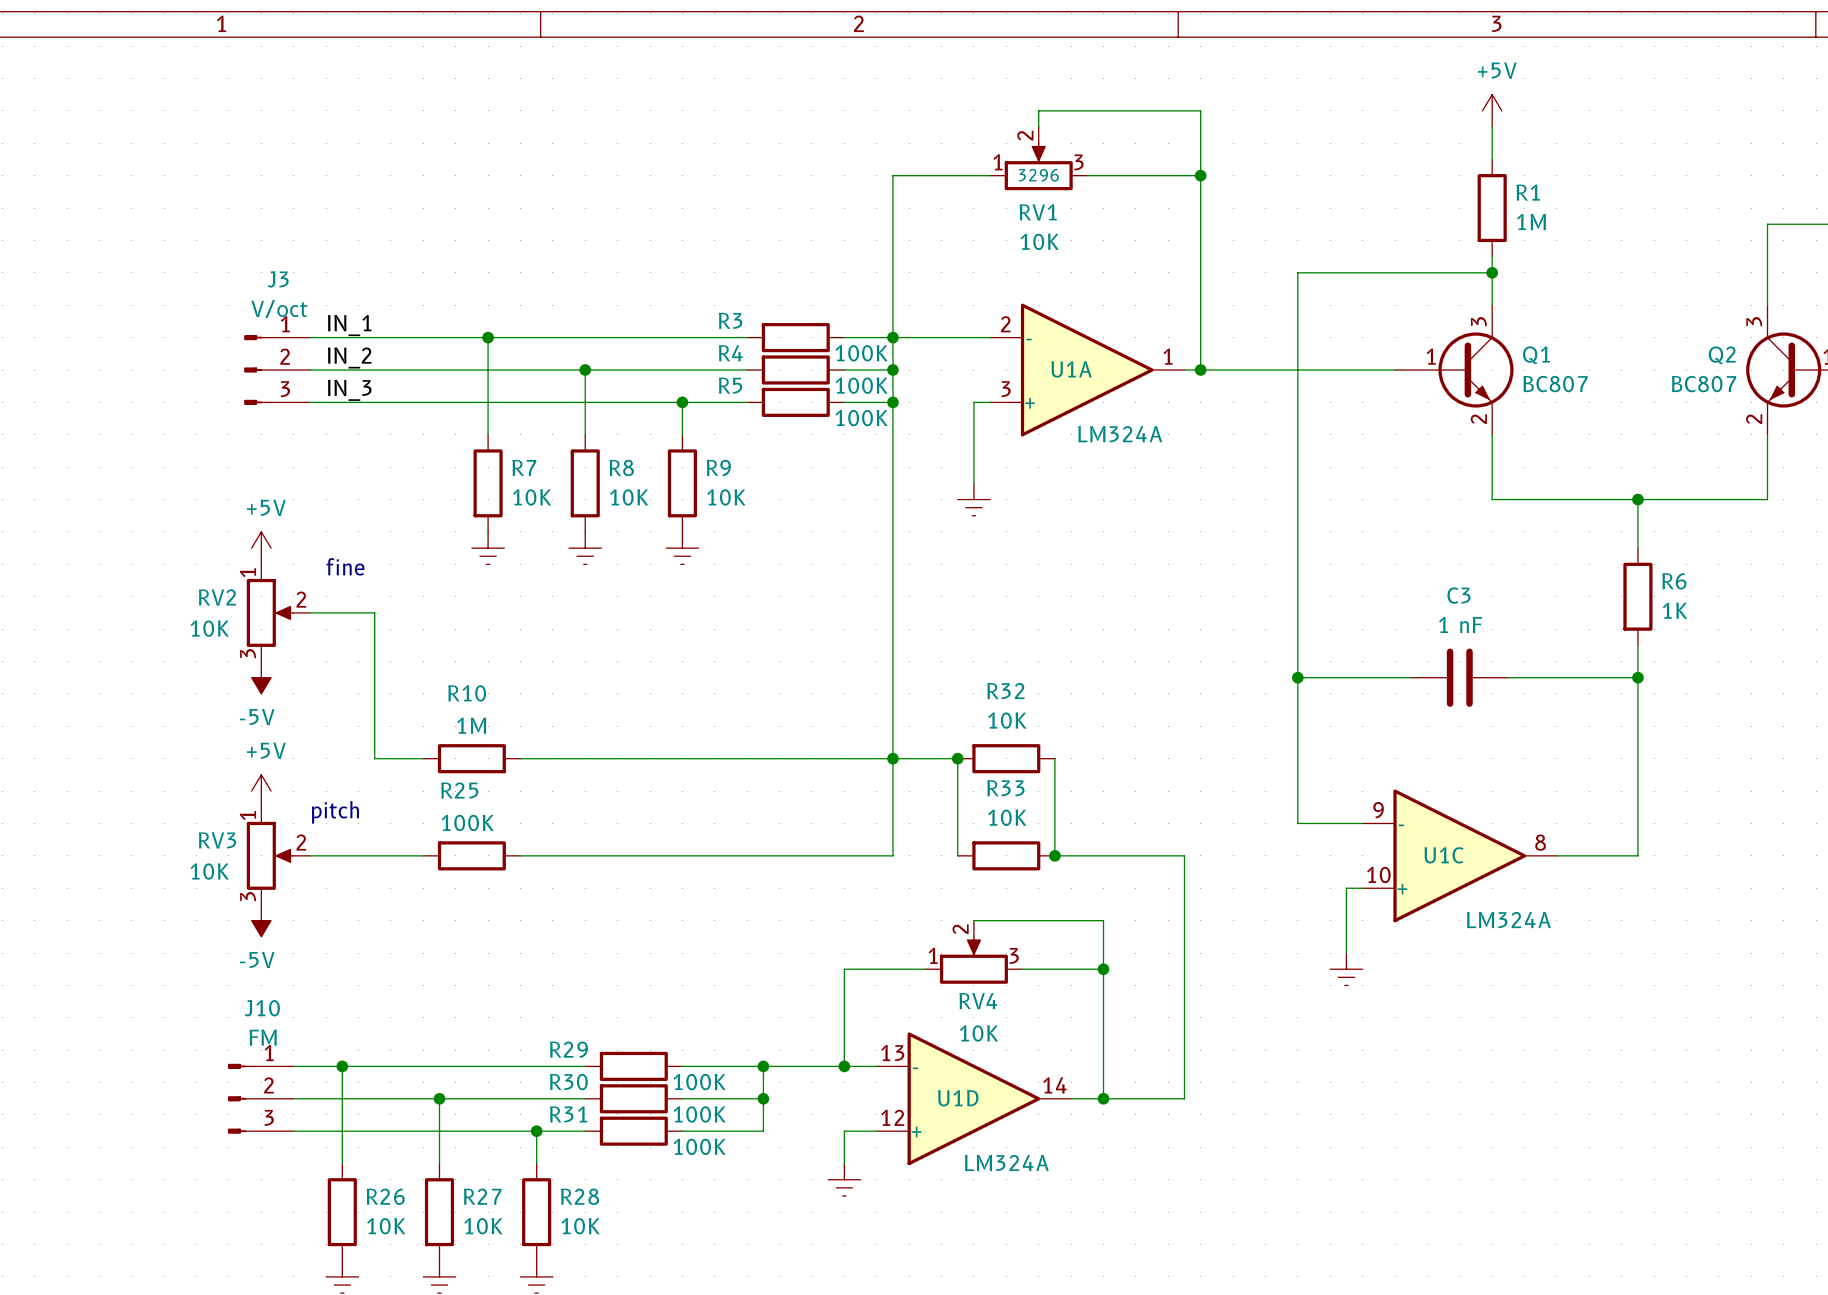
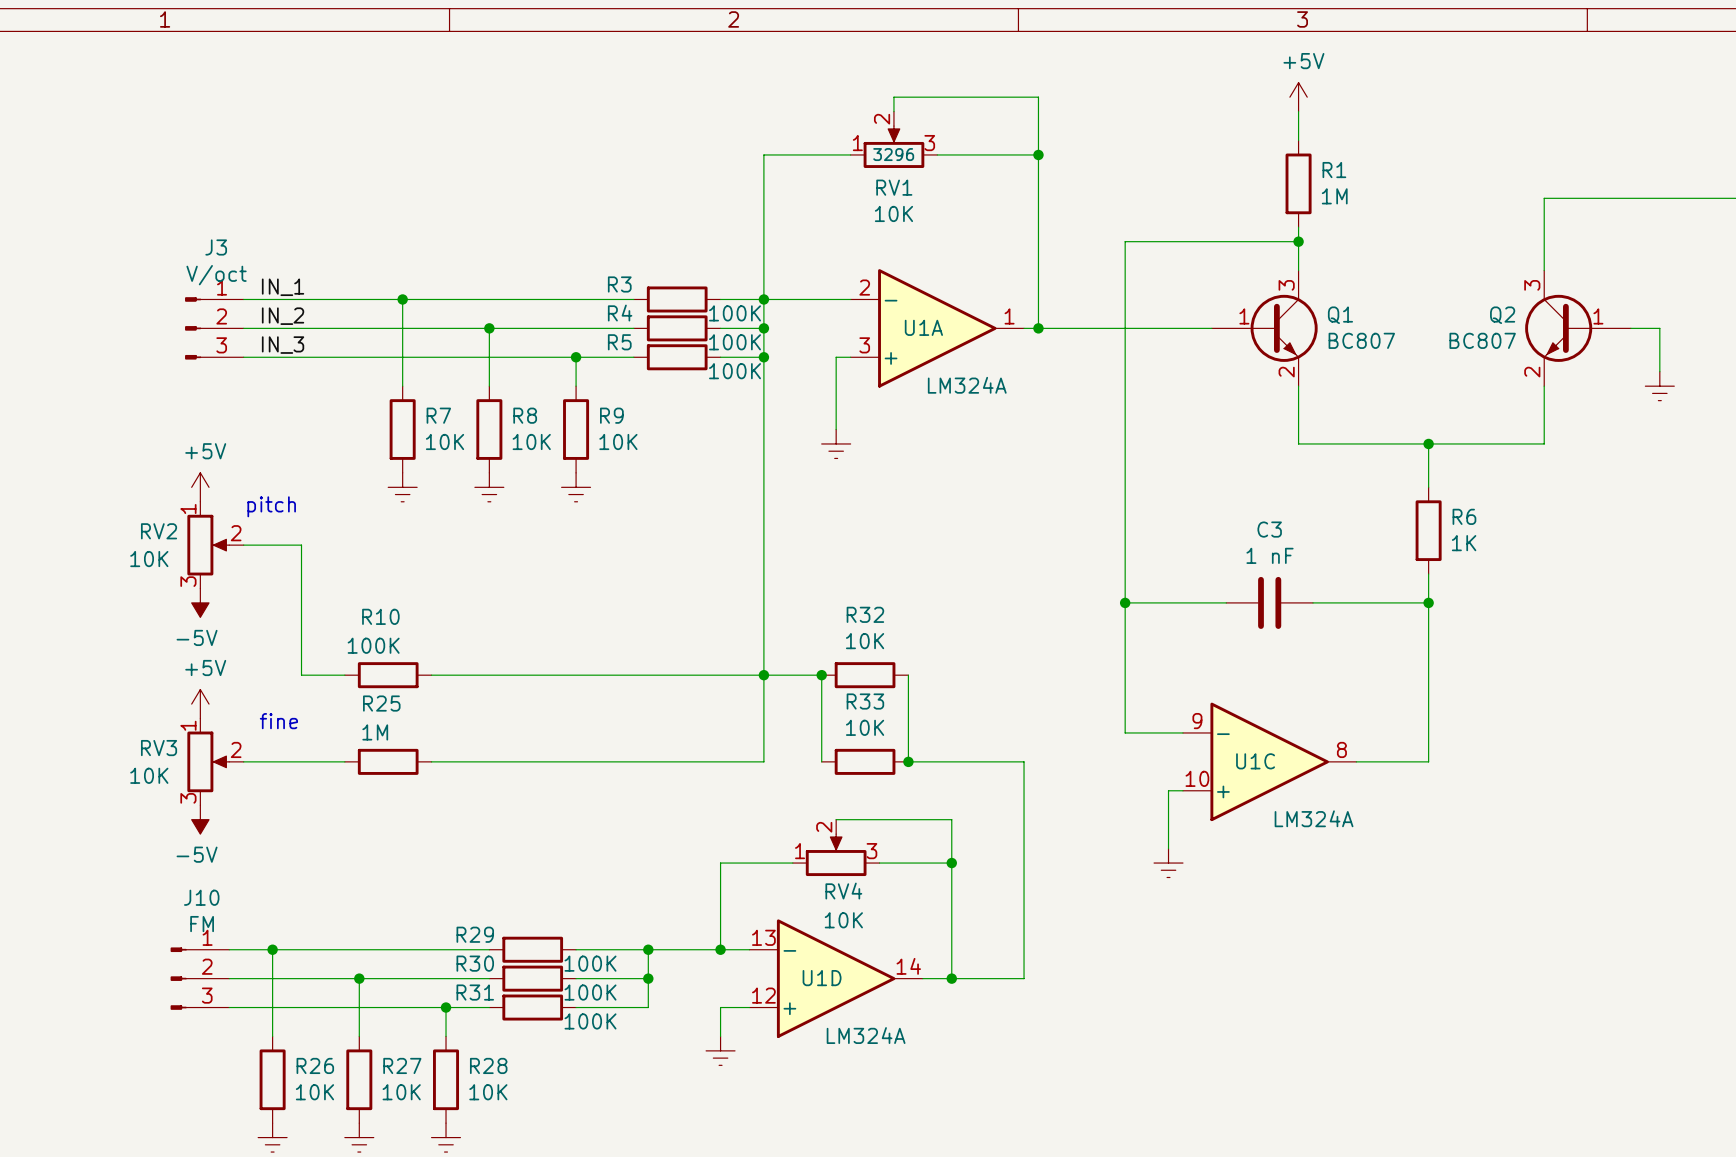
text position: fine (345, 566) -> fine (278, 721)
R10 value: 1M (471, 725) -> 100K (373, 645)
text position: pitch (335, 812) -> pitch (271, 506)
R25 value: 100K (467, 822) -> 1M (375, 732)

